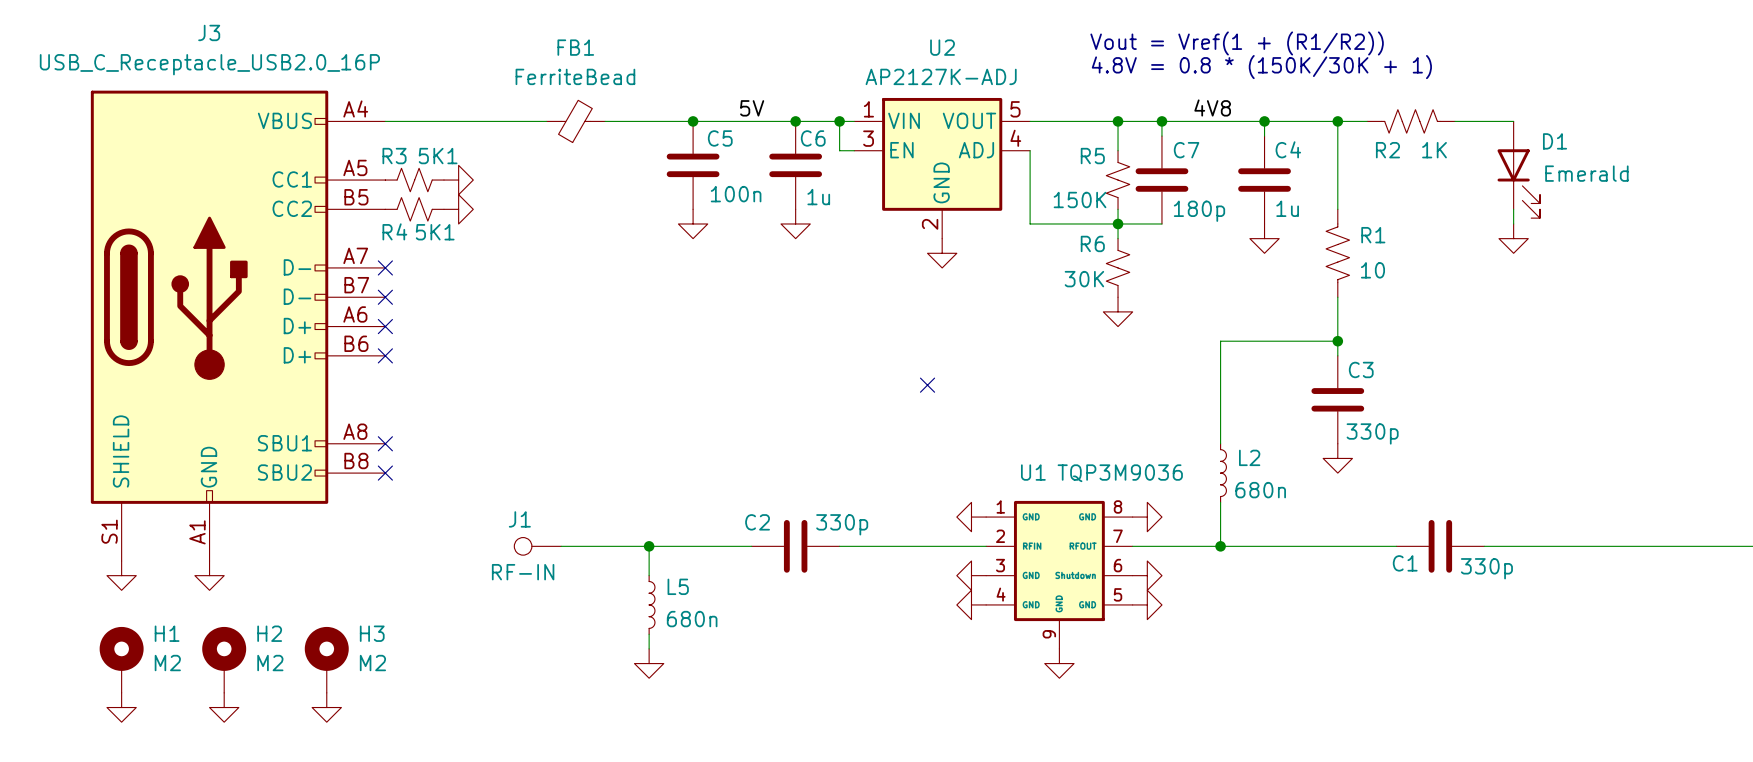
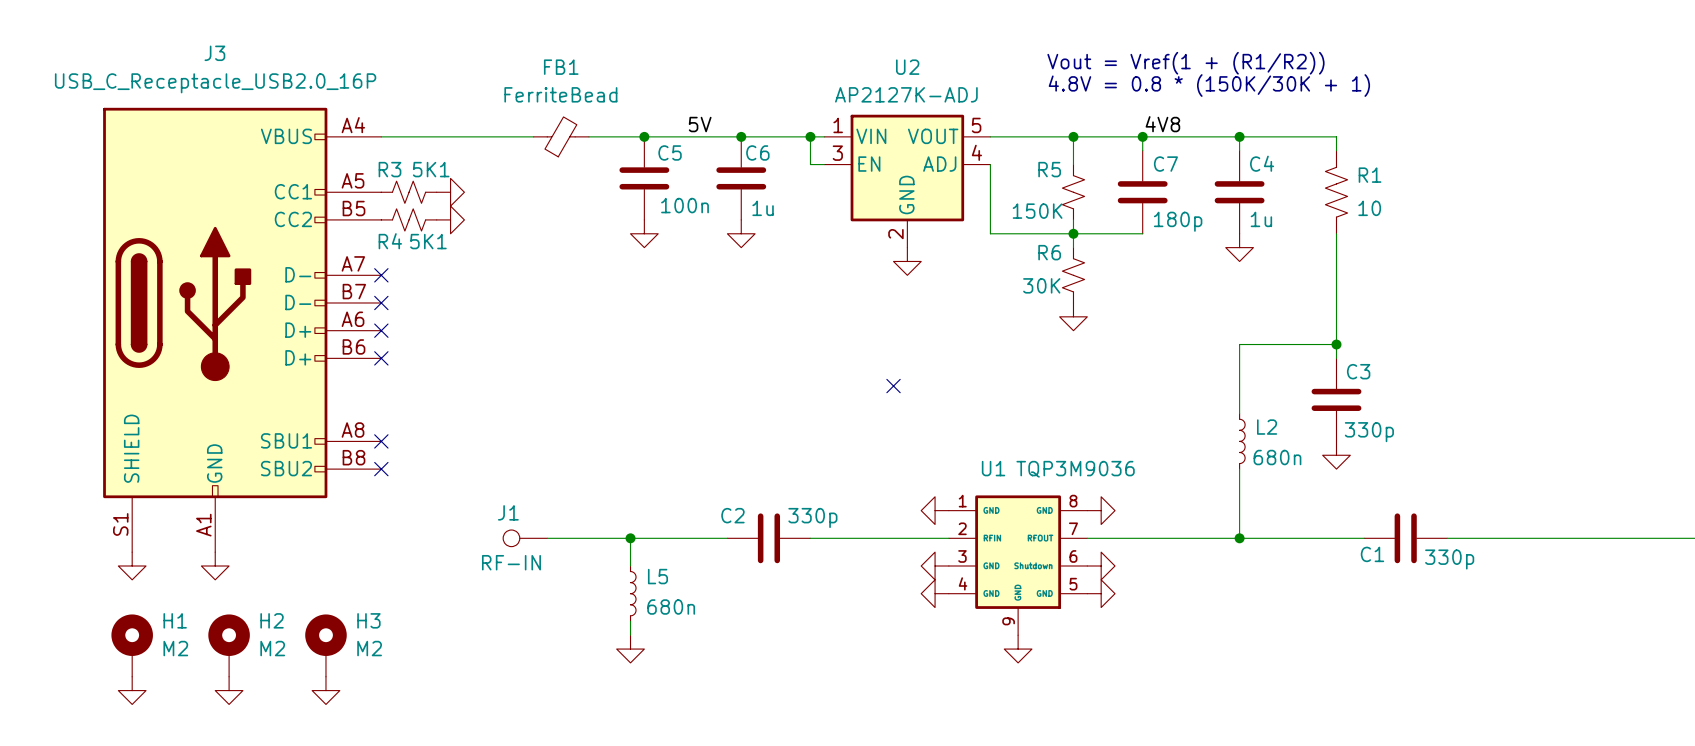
label position: 5V (752, 108) -> 5V (700, 124)
junction position: (693, 121) -> (644, 136)
junction position: (795, 121) -> (741, 136)
wire: (1161, 121) (1161, 136) -> (1142, 136) (1142, 150)
junction position: (1161, 121) -> (1142, 136)
wire: (1264, 121) (1264, 136) -> (1239, 136) (1239, 150)
junction: (1264, 121) -> none
junction: none -> (1239, 136)
wire: (1337, 121) (1337, 209) -> none
junction: (1337, 121) -> none
wire: none -> (1308, 136) (1336, 136) (1336, 150)
R2: 1K (1411, 121) -> none
wire: (1455, 121) (1513, 121) -> (1281, 344) (1336, 344)
C5 position: (693, 165) -> (644, 178)
C6 position: (795, 165) -> (741, 178)
D1: Emerald (1518, 169) -> none
C7 position: (1161, 180) -> (1142, 192)
C4 position: (1264, 180) -> (1239, 192)
wire: (1513, 209) (1513, 223) -> none
power symbol position: (693, 223) -> (644, 233)
power symbol position: (795, 223) -> (741, 233)
wire: none -> (1115, 233) (1142, 233)
wire: none -> (1336, 233) (1336, 358)
power symbol position: (1264, 238) -> (1239, 247)
power symbol: (1513, 238) -> none
R1 position: (1337, 253) -> (1336, 192)
wire: (1337, 297) (1337, 355) -> none
wire: (1293, 341) (1220, 341) (1220, 443) -> (1239, 344) (1239, 413)
junction position: (1337, 341) -> (1336, 344)
C3 position: (1337, 399) -> (1336, 399)
power symbol position: (1337, 458) -> (1336, 455)
L2 position: (1223, 473) -> (1242, 441)
wire: none -> (1239, 469) (1239, 538)
wire: (1220, 502) (1220, 546) -> none
junction: (1220, 546) -> none
junction: none -> (1239, 538)
C1 position: (1440, 546) -> (1405, 538)

